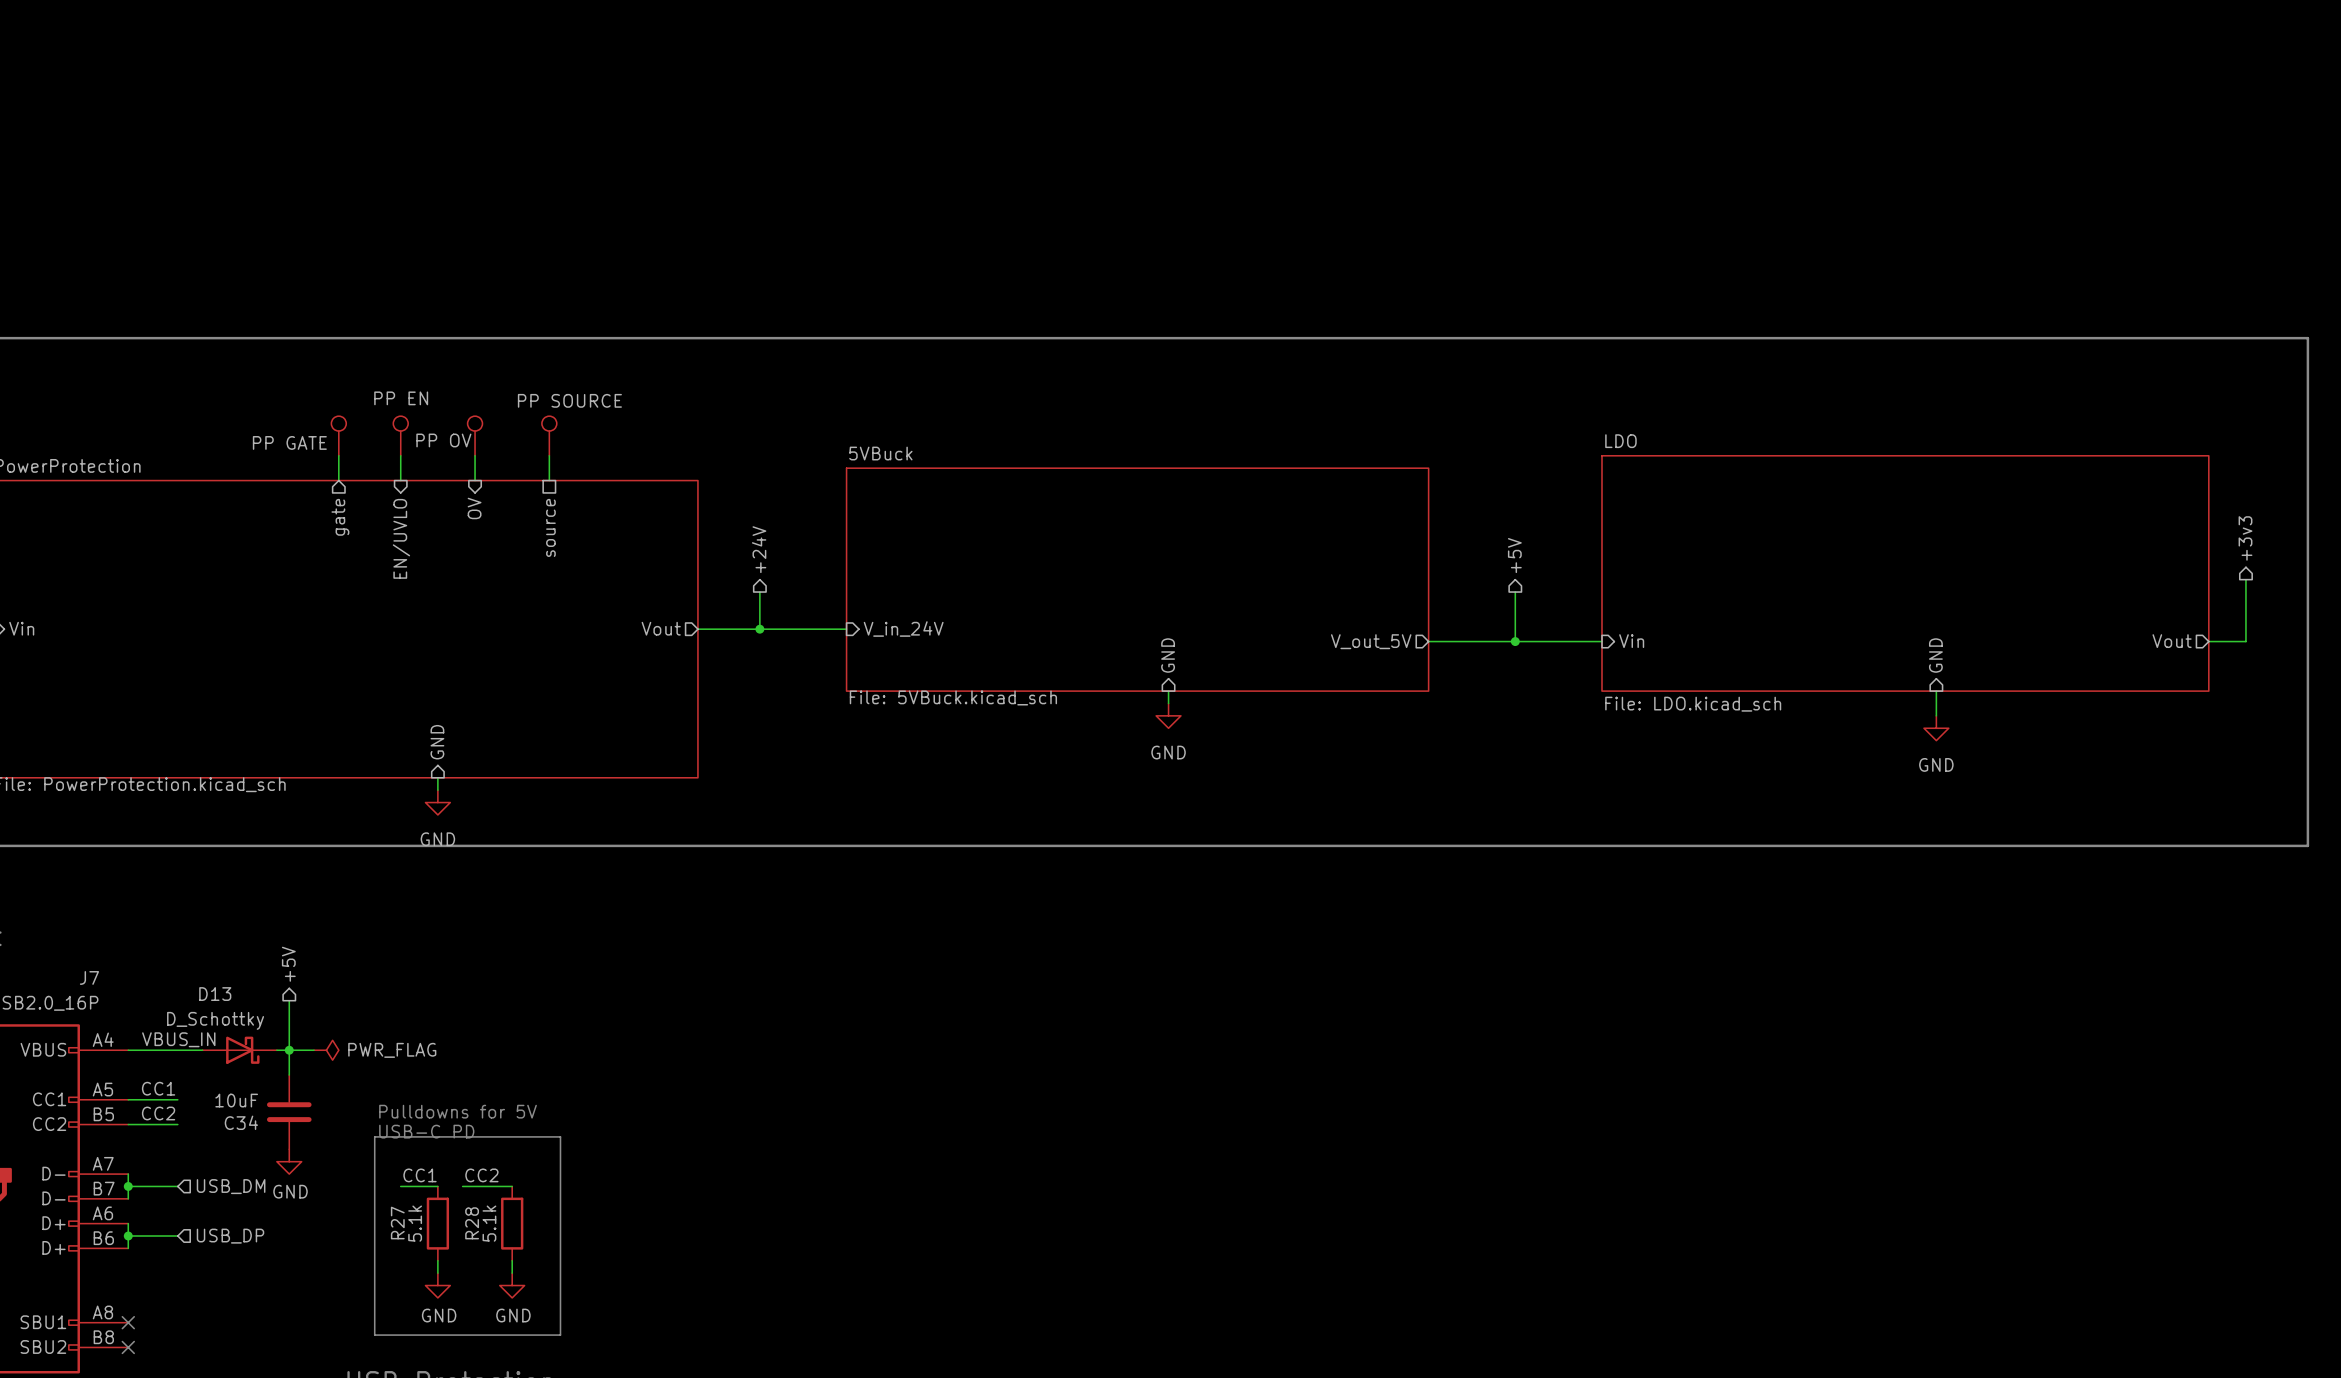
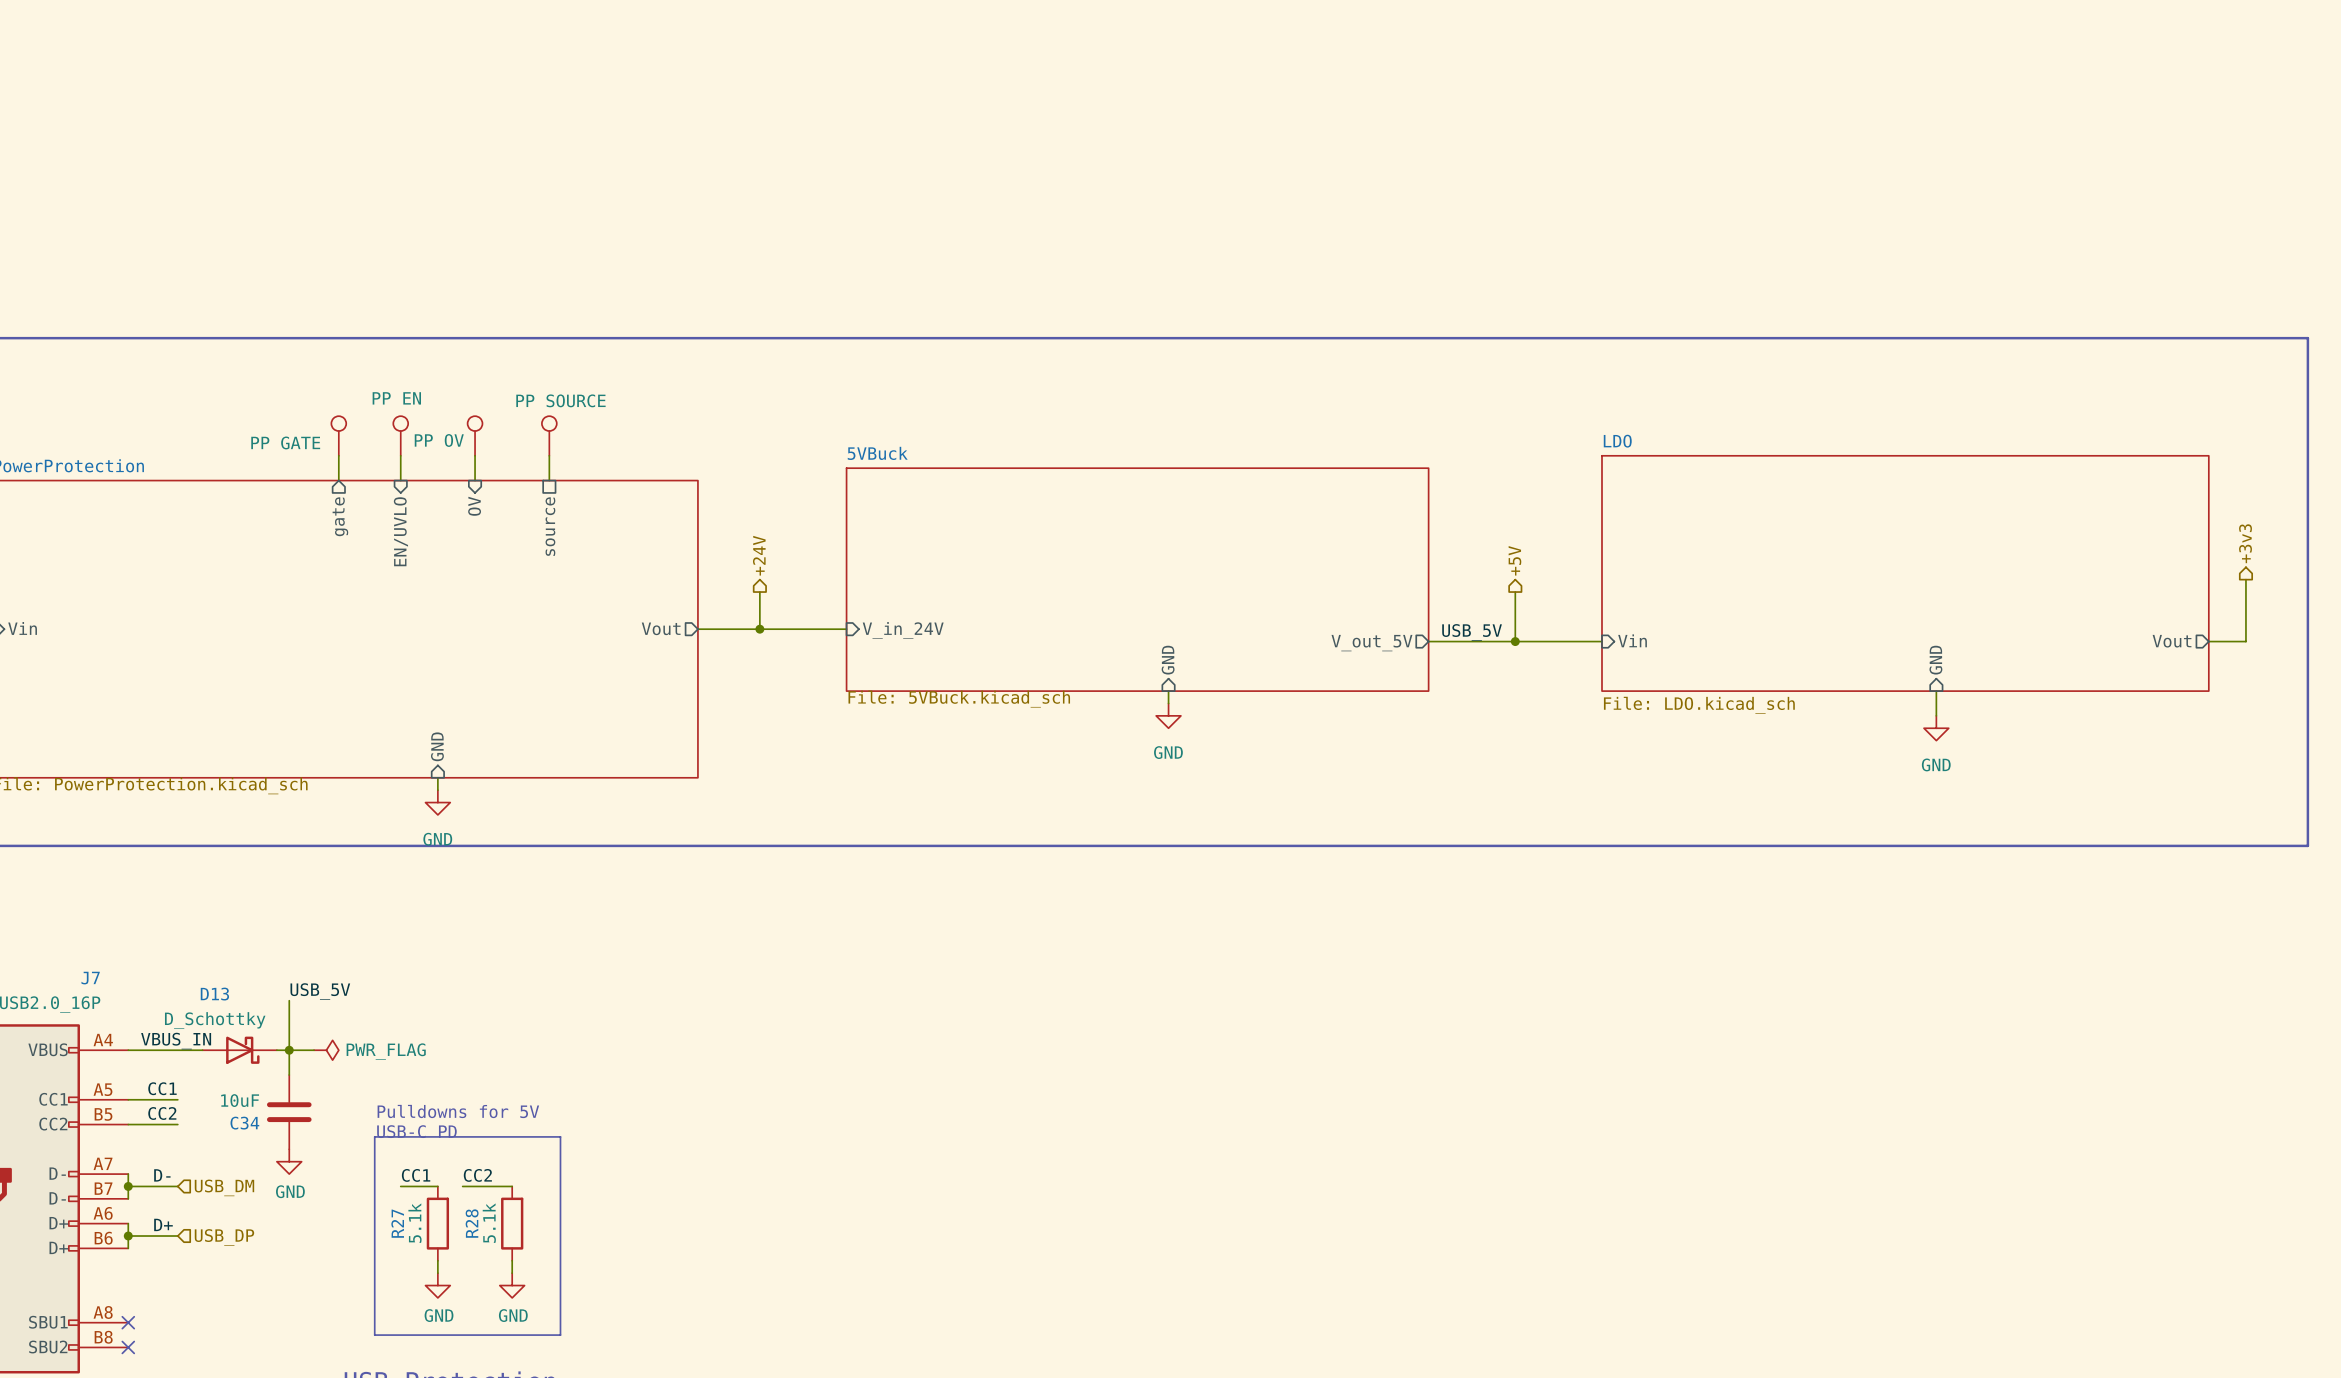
label: none -> USB_5V (1472, 632)
hierarchical label: +5V (288, 964) -> none
label: none -> USB_5V (320, 991)
label: none -> D- (162, 1175)
label: none -> D+ (163, 1224)

